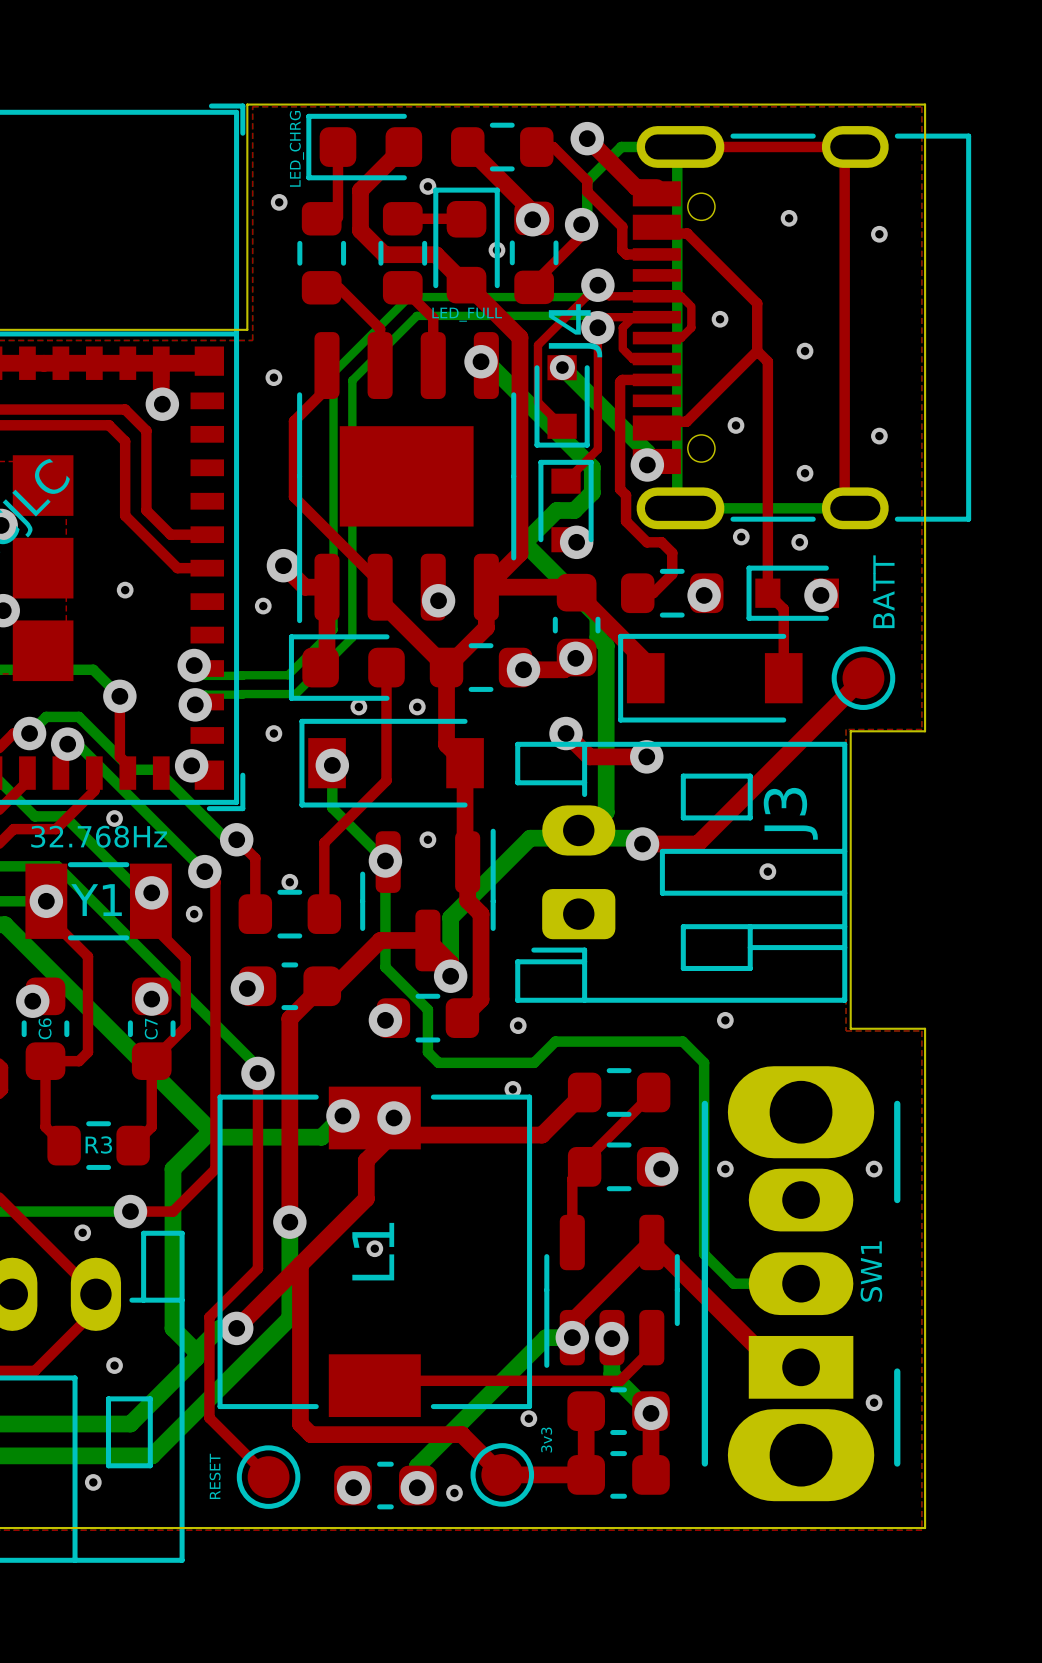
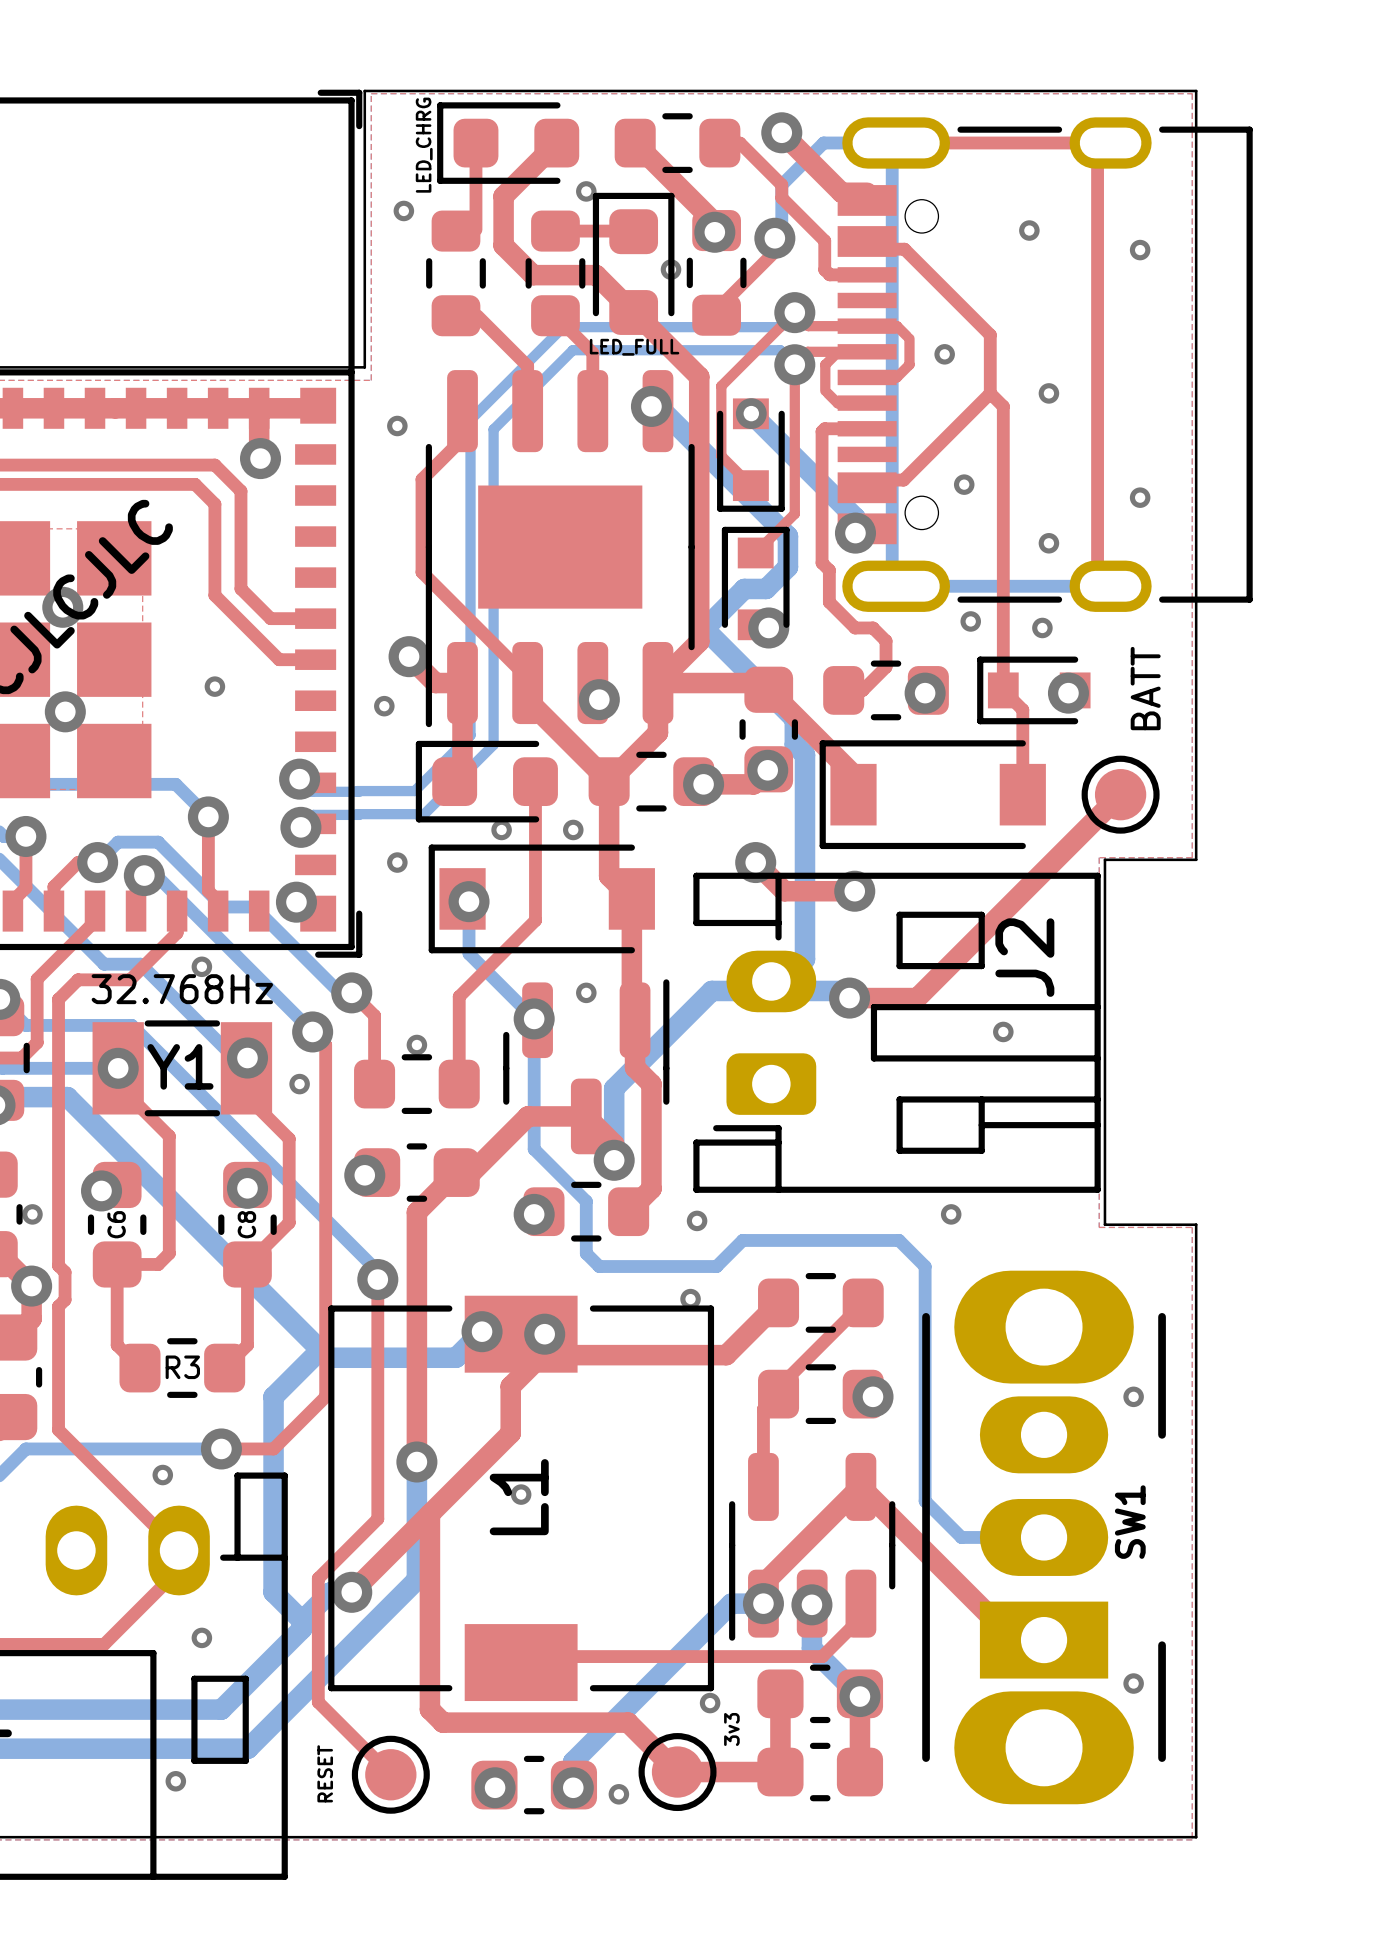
J4 name: J4 (575, 330) -> none
J3 name: J3 (790, 813) -> J2 (1024, 957)
C7 name: C7 (151, 1029) -> C8 (246, 1224)
via: (725, 1169) -> none

